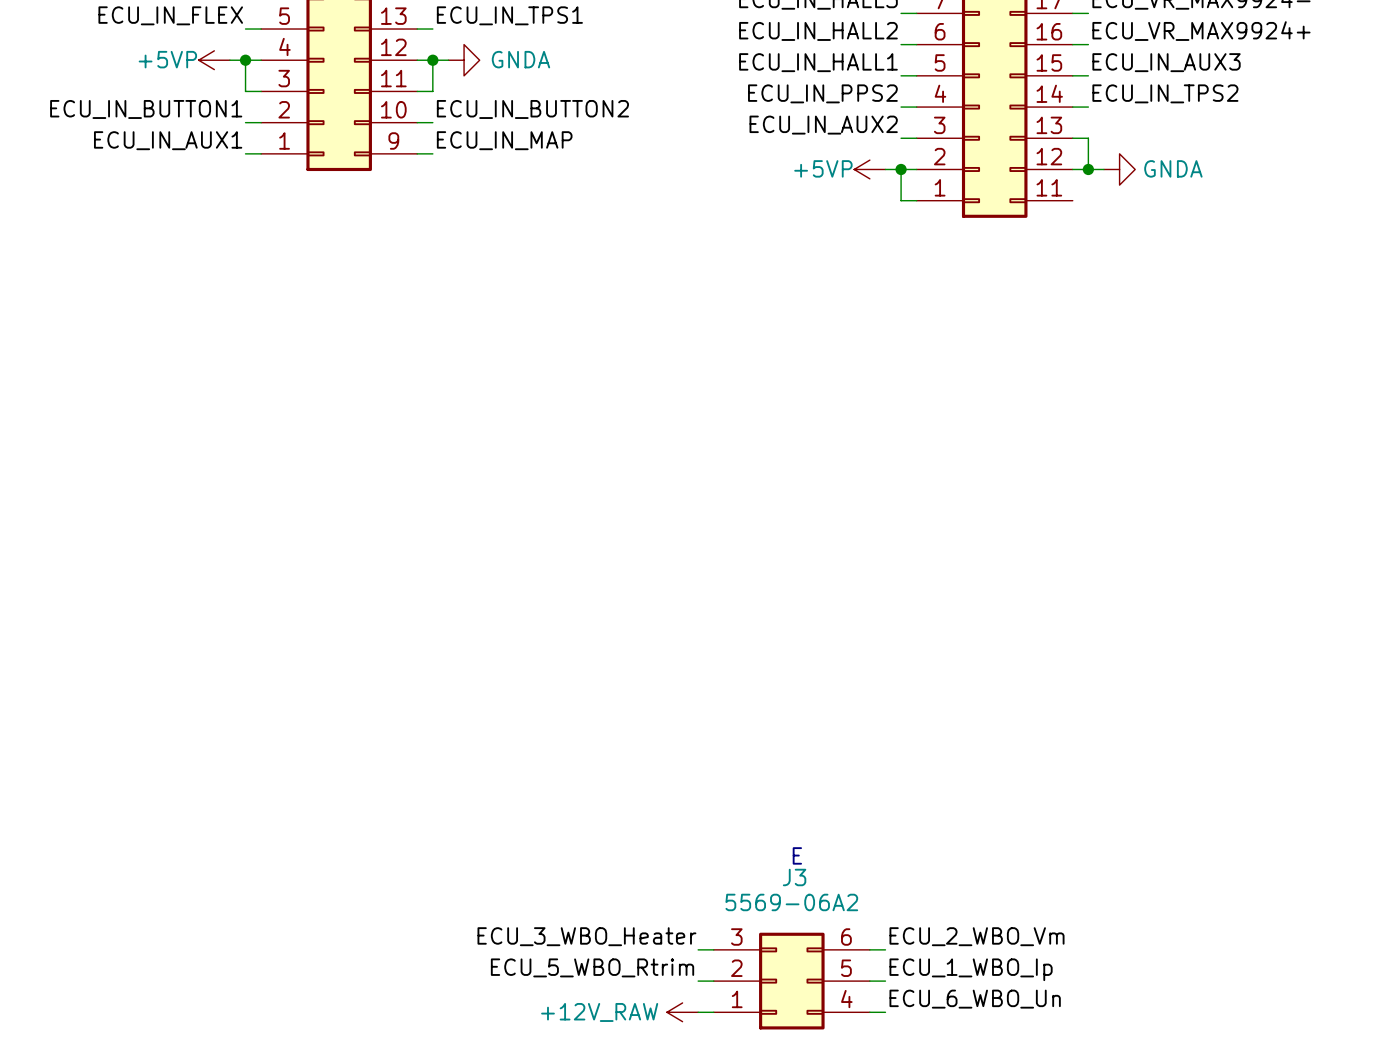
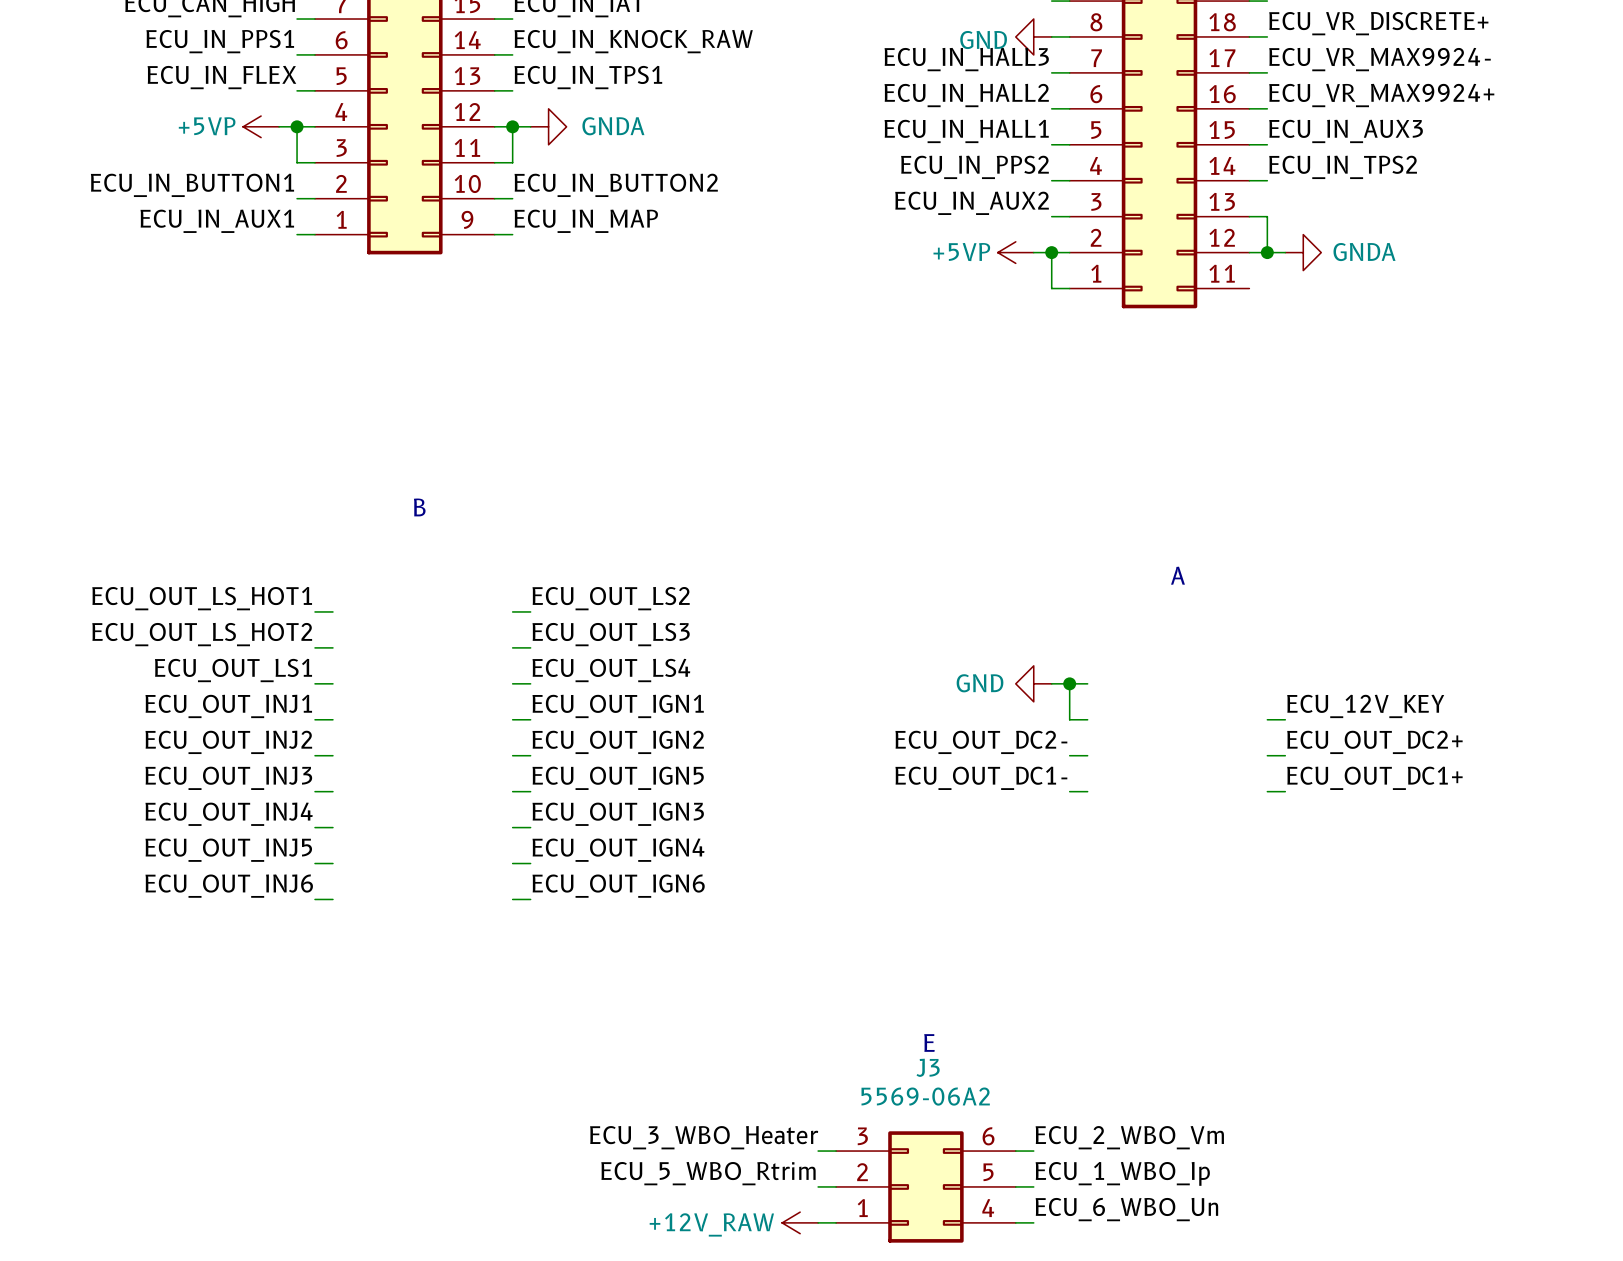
text: none -> B (419, 507)
text: none -> A (1177, 575)
label: none -> ECU_OUT_LS_HOT1 (202, 598)
label: none -> ECU_OUT_LS2 (611, 598)
wire: none -> (315, 611) (332, 611)
wire: none -> (512, 611) (530, 611)
label: none -> ECU_OUT_LS_HOT2 (202, 634)
label: none -> ECU_OUT_LS3 (611, 634)
wire: none -> (315, 647) (332, 647)
wire: none -> (512, 647) (530, 647)
label: none -> ECU_OUT_LS1 (233, 670)
label: none -> ECU_OUT_LS4 (611, 670)
wire: none -> (315, 683) (332, 683)
wire: none -> (512, 683) (530, 683)
power symbol: none -> GND (1033, 683)
wire: none -> (1051, 683) (1087, 683)
wire: none -> (1069, 683) (1069, 719) (1087, 719)
junction: none -> (1069, 683)
label: none -> ECU_OUT_INJ1 (228, 706)
label: none -> ECU_OUT_IGN1 (618, 706)
label: none -> ECU_12V_KEY (1365, 706)
wire: none -> (315, 719) (332, 719)
wire: none -> (512, 719) (530, 719)
wire: none -> (1267, 719) (1285, 719)
label: none -> ECU_OUT_INJ2 (228, 742)
label: none -> ECU_OUT_IGN2 (618, 742)
label: none -> ECU_OUT_DC2- (981, 742)
label: none -> ECU_OUT_DC2+ (1374, 742)
wire: none -> (315, 755) (332, 755)
wire: none -> (512, 755) (530, 755)
wire: none -> (1069, 755) (1087, 755)
wire: none -> (1267, 755) (1285, 755)
label: none -> ECU_OUT_INJ3 (228, 778)
label: none -> ECU_OUT_IGN5 (618, 778)
label: none -> ECU_OUT_DC1- (981, 778)
label: none -> ECU_OUT_DC1+ (1374, 778)
wire: none -> (315, 791) (332, 791)
wire: none -> (512, 791) (530, 791)
wire: none -> (1069, 791) (1087, 791)
wire: none -> (1267, 791) (1285, 791)
label: none -> ECU_OUT_INJ4 (229, 814)
label: none -> ECU_OUT_IGN3 (618, 814)
wire: none -> (315, 827) (332, 827)
wire: none -> (512, 827) (530, 827)
label: none -> ECU_OUT_INJ5 (228, 850)
label: none -> ECU_OUT_IGN4 (618, 850)
wire: none -> (315, 863) (332, 863)
wire: none -> (512, 863) (530, 863)
label: none -> ECU_OUT_INJ6 (229, 886)
label: none -> ECU_OUT_IGN6 (618, 886)
wire: none -> (315, 899) (332, 899)
wire: none -> (512, 899) (530, 899)

